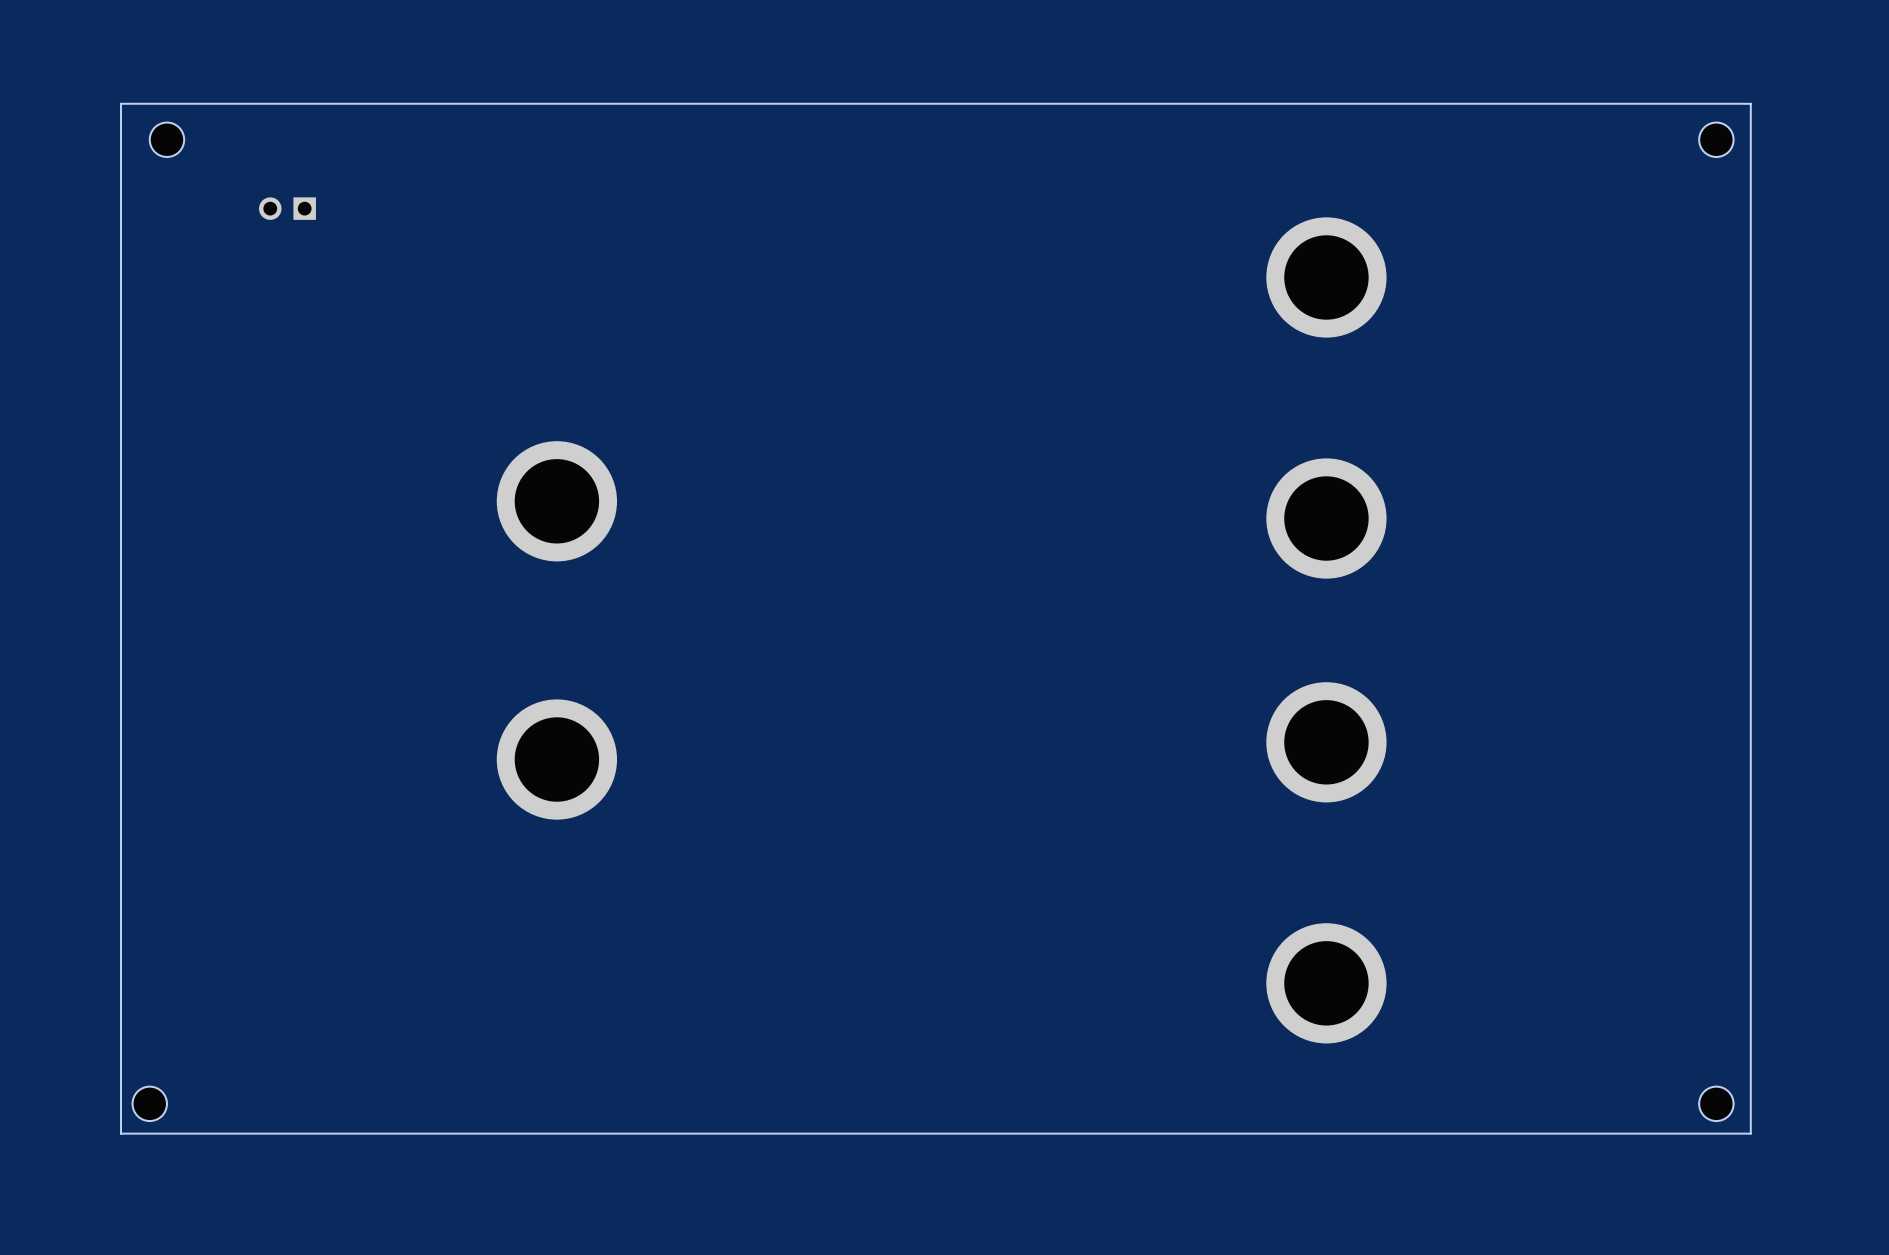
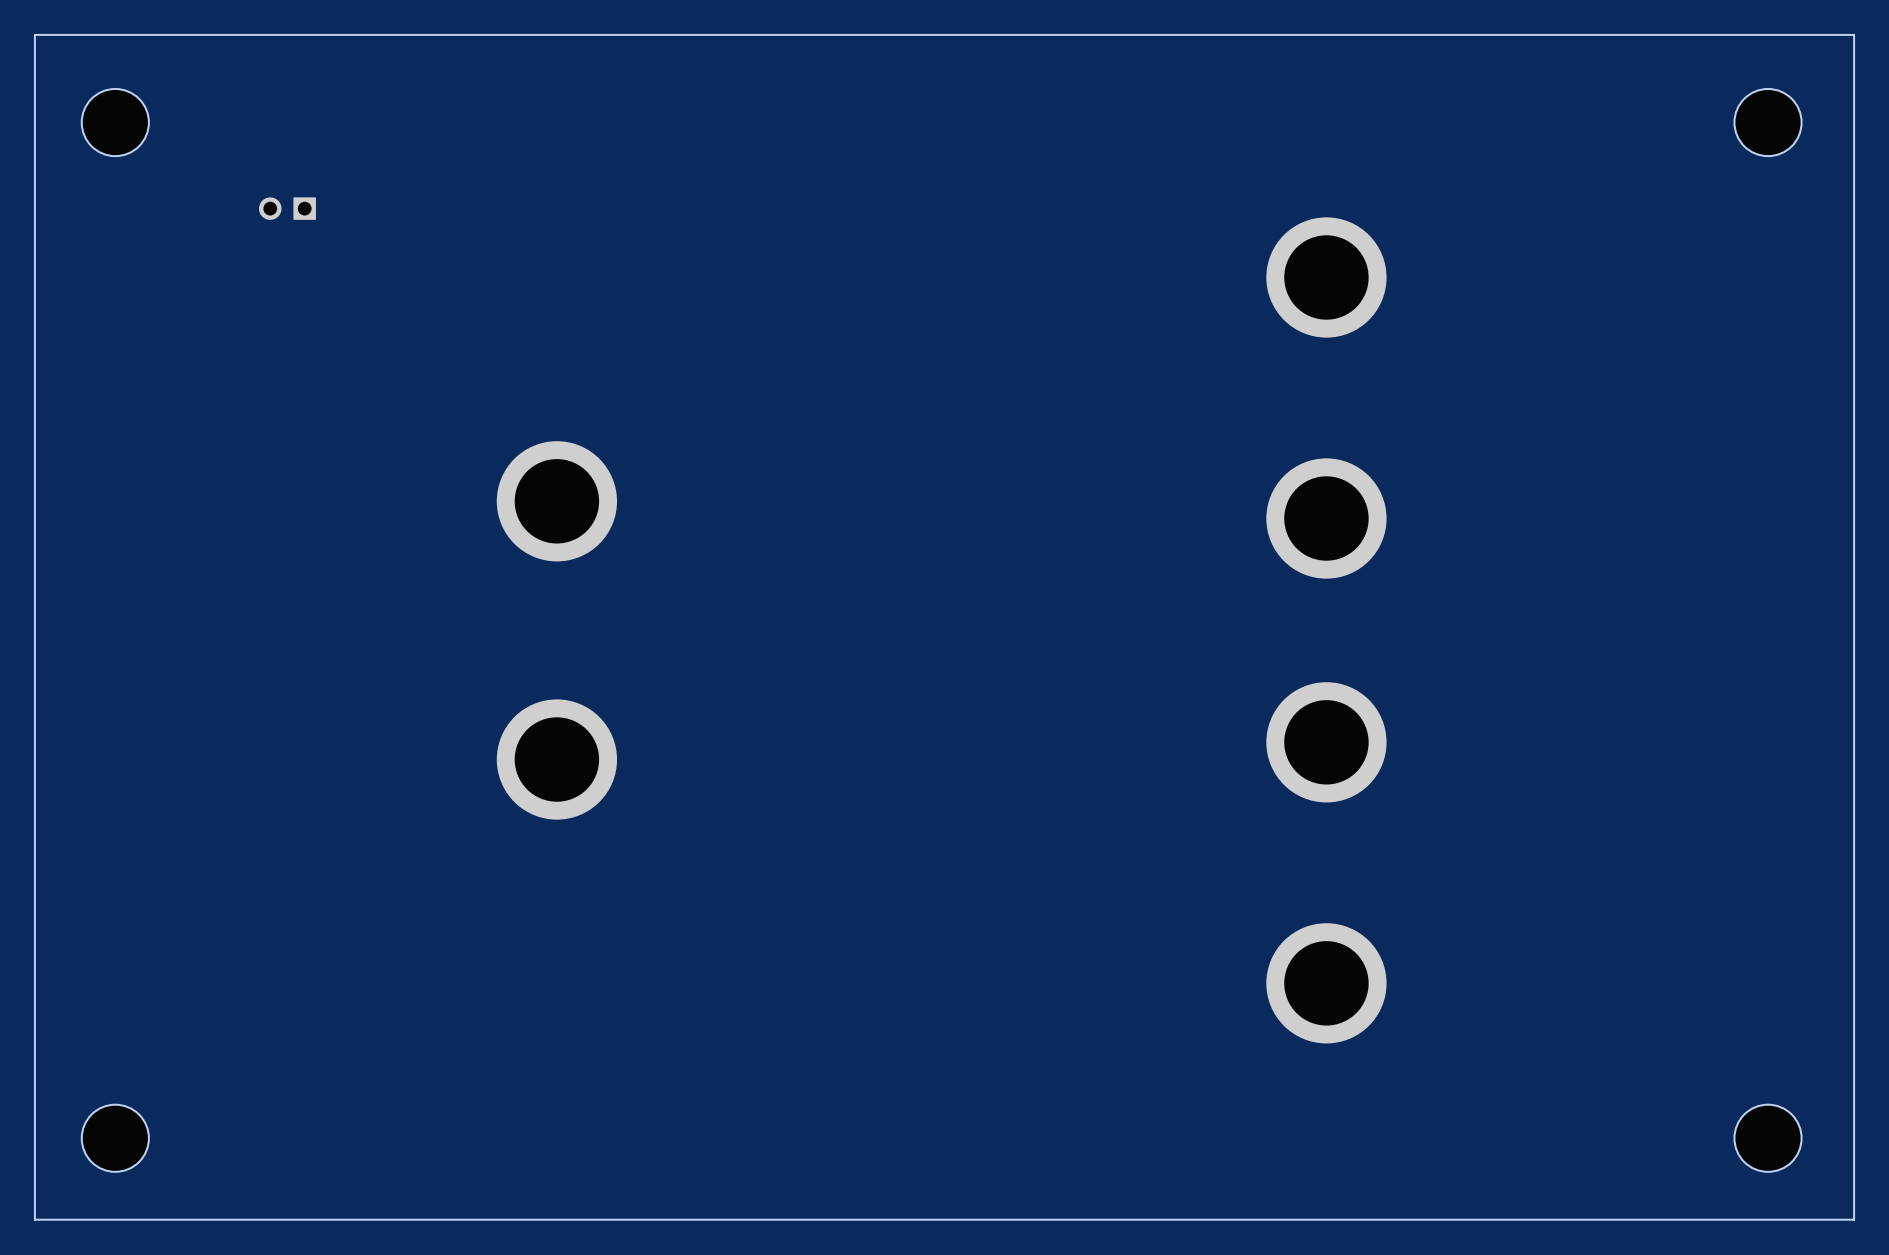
board edge: (1750, 103) (121, 103) (121, 1133) (1750, 1133) (1750, 103) -> (1854, 34) (1854, 1219) (34, 1219) (34, 34) (1854, 34)
part: none -> (115, 122)
part: none -> (1768, 122)
hole: (166, 139) -> none
hole: (1716, 139) -> none
hole: (149, 1103) -> none
hole: (1716, 1103) -> none
part: none -> (115, 1138)
part: none -> (1768, 1138)

